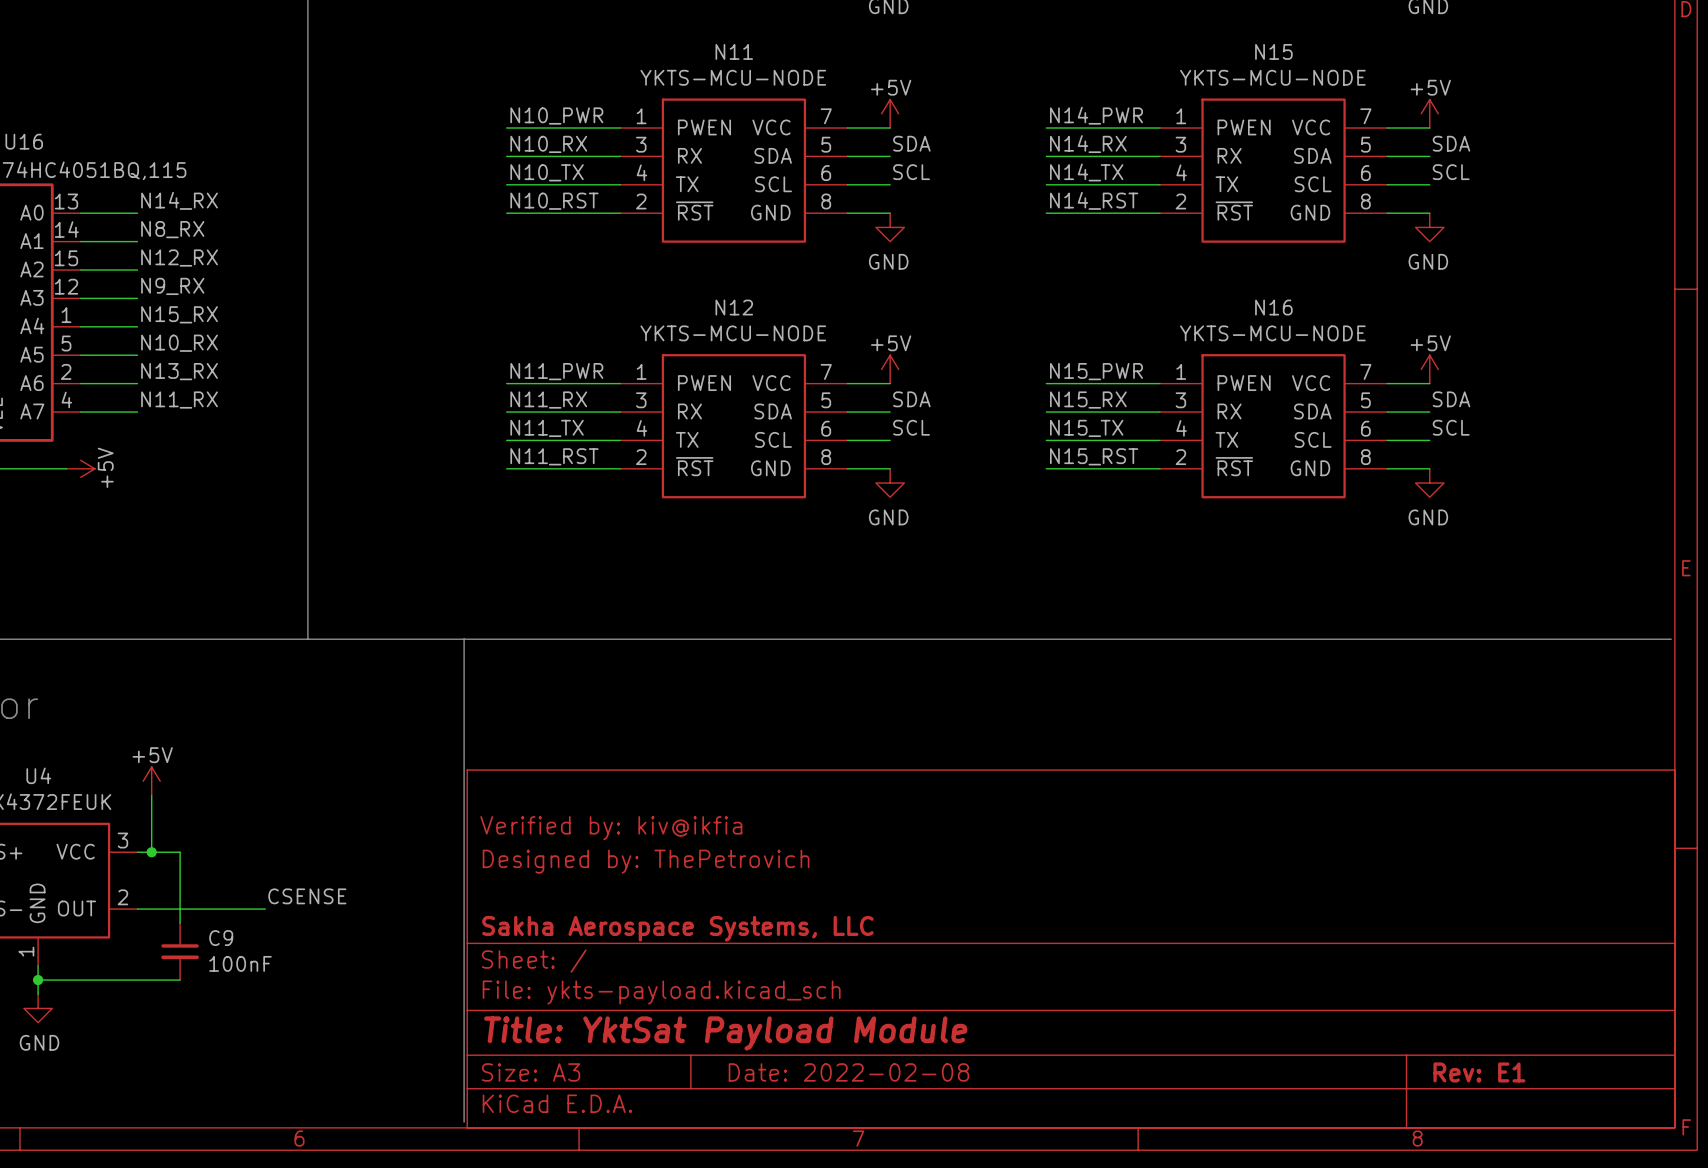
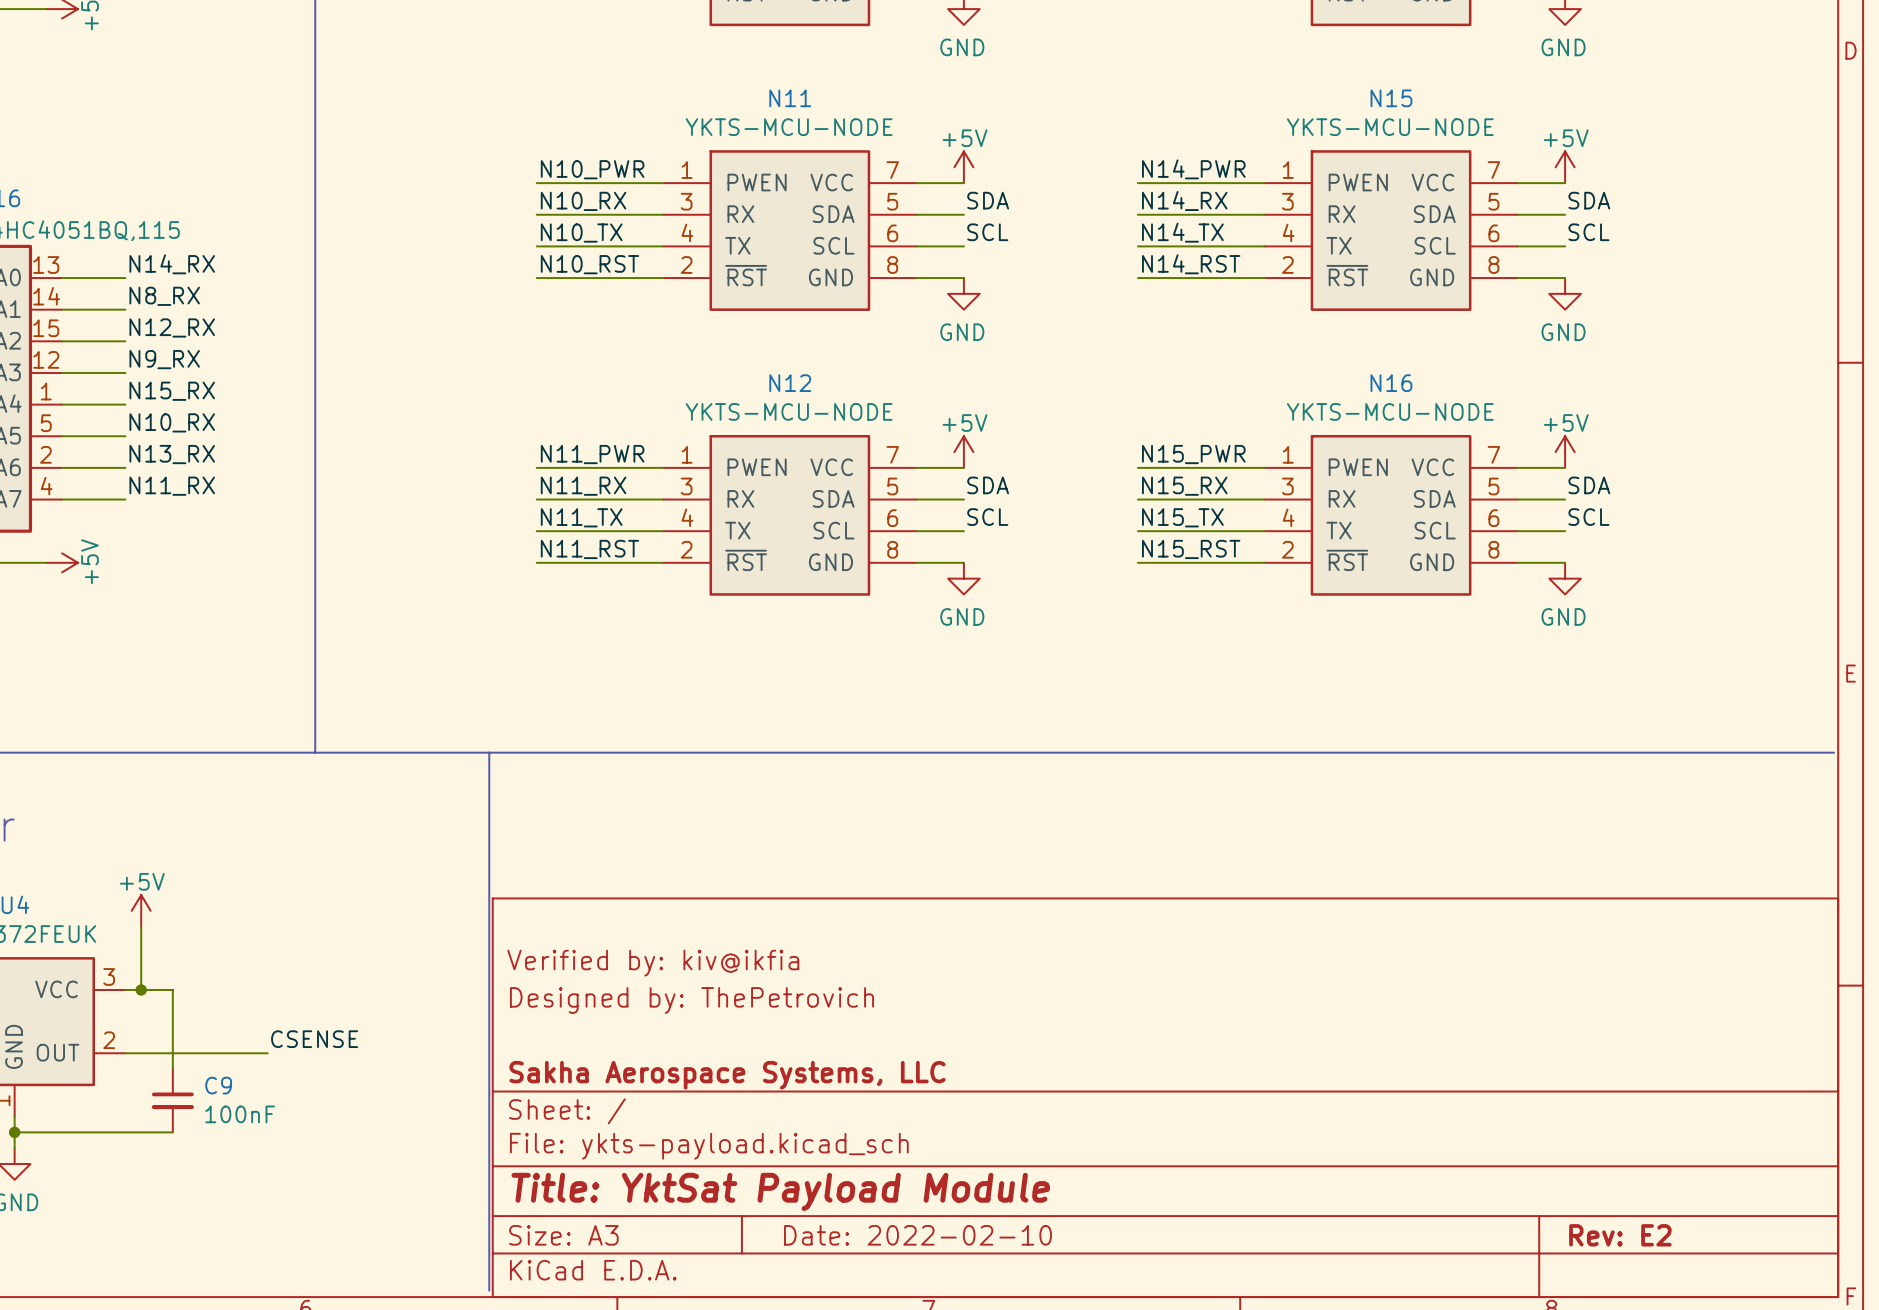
title block: Date: 2022-02-08 (848, 1072) -> Date: 2022-02-10 (918, 1235)
title block: Rev: E1 (1479, 1072) -> Rev: E2 (1620, 1235)

